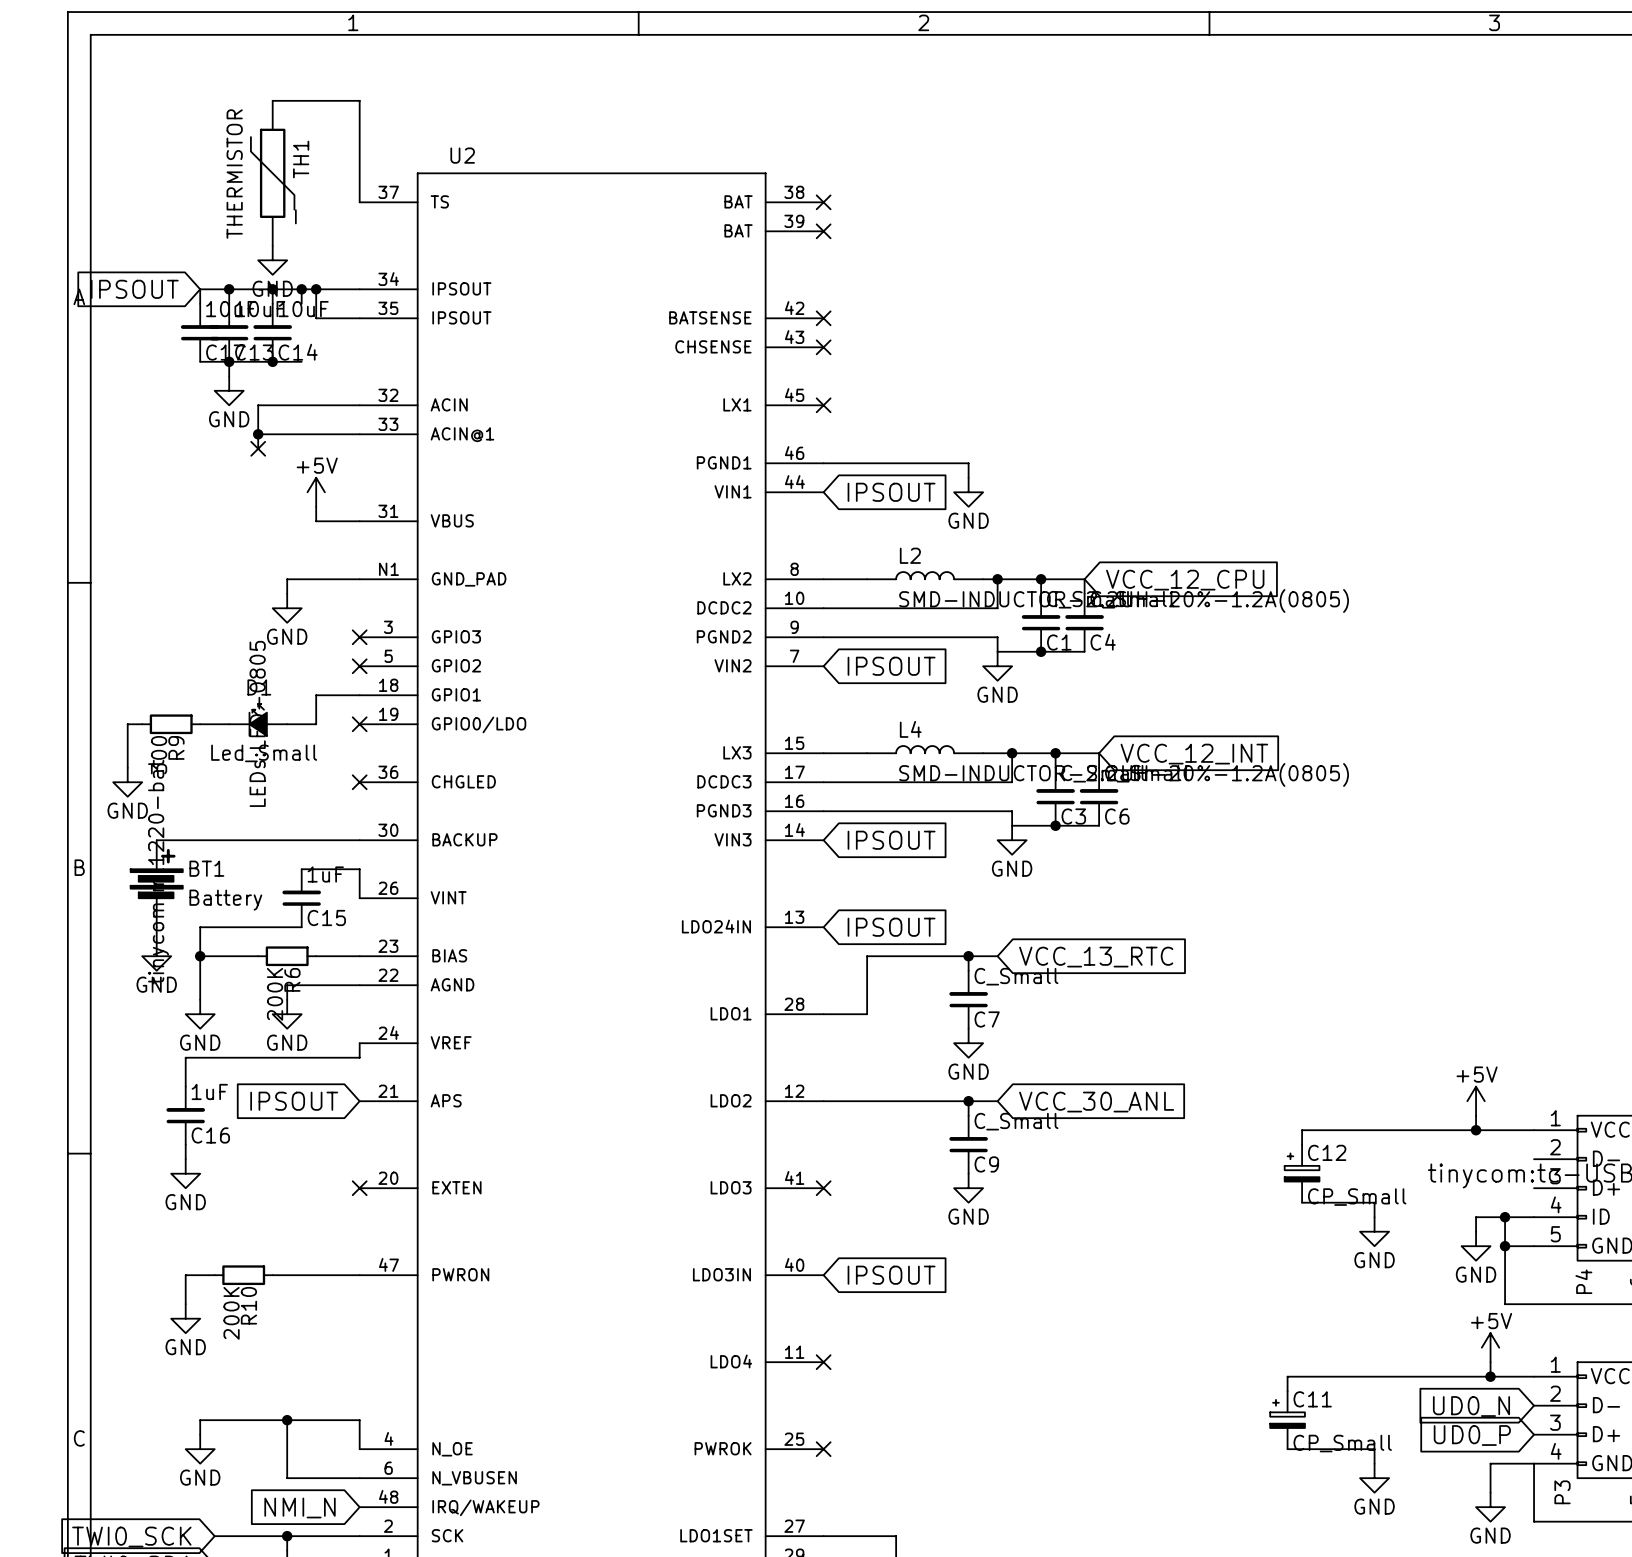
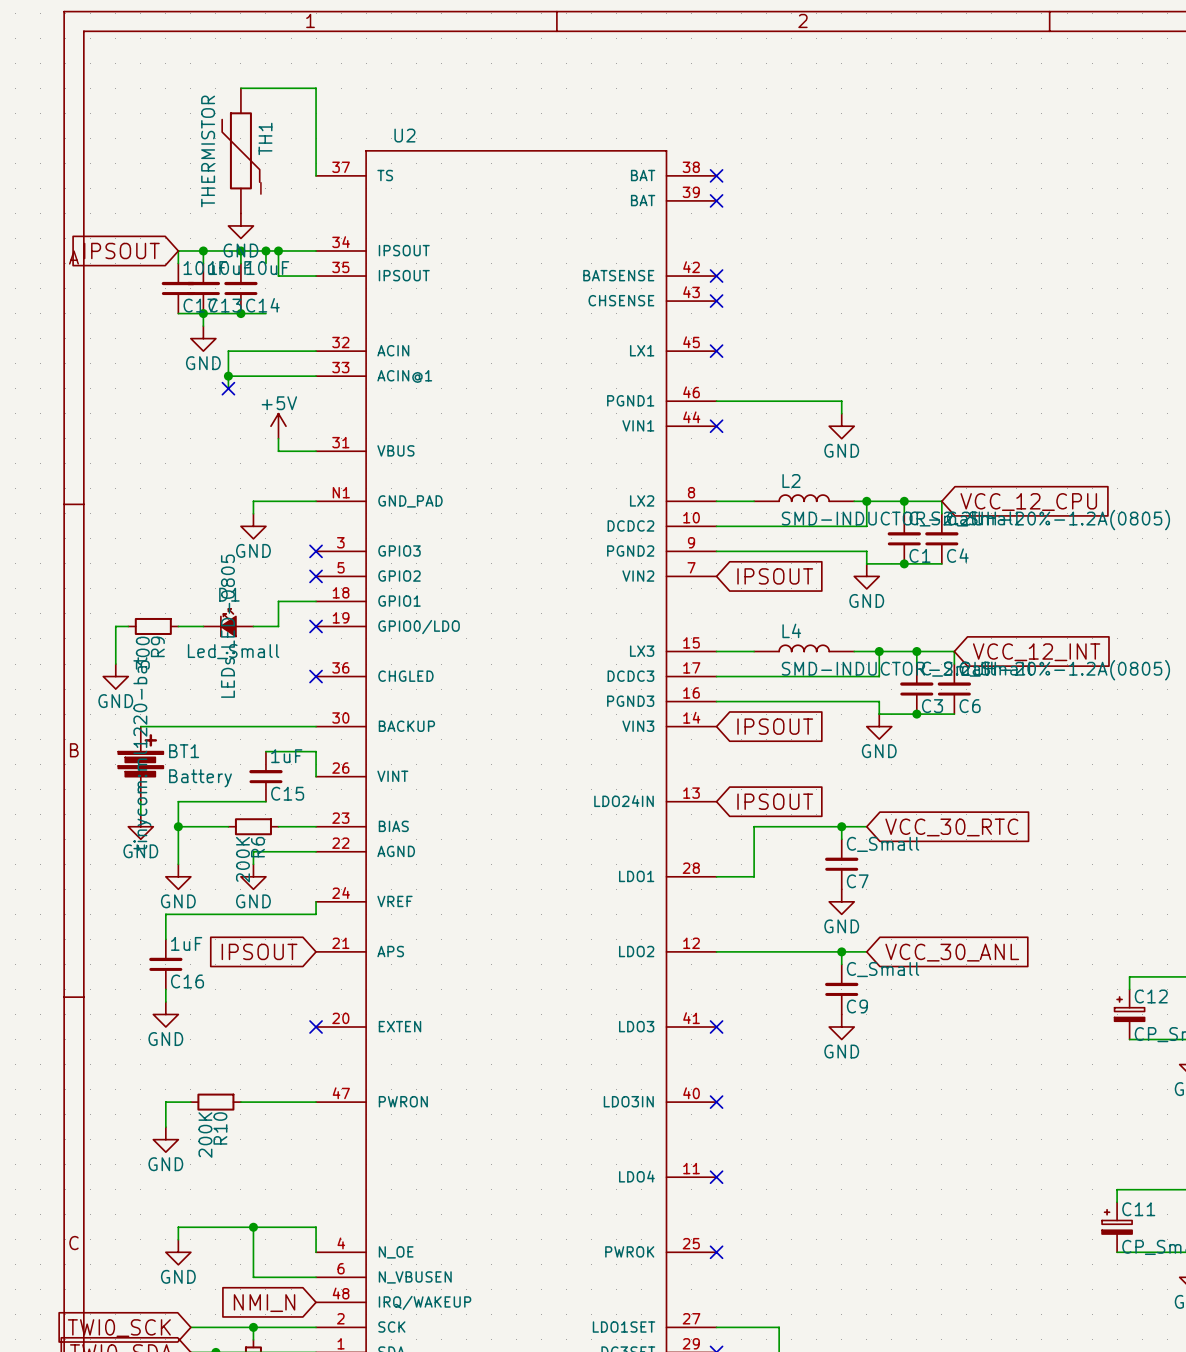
no-connect mark: none -> (716, 426)
global label: IPSOUT (891, 492) -> none
global label: VCC_13_RTC (1096, 957) -> VCC_30_RTC (951, 827)
no-connect mark: none -> (716, 1102)
global label: IPSOUT (891, 1275) -> none

